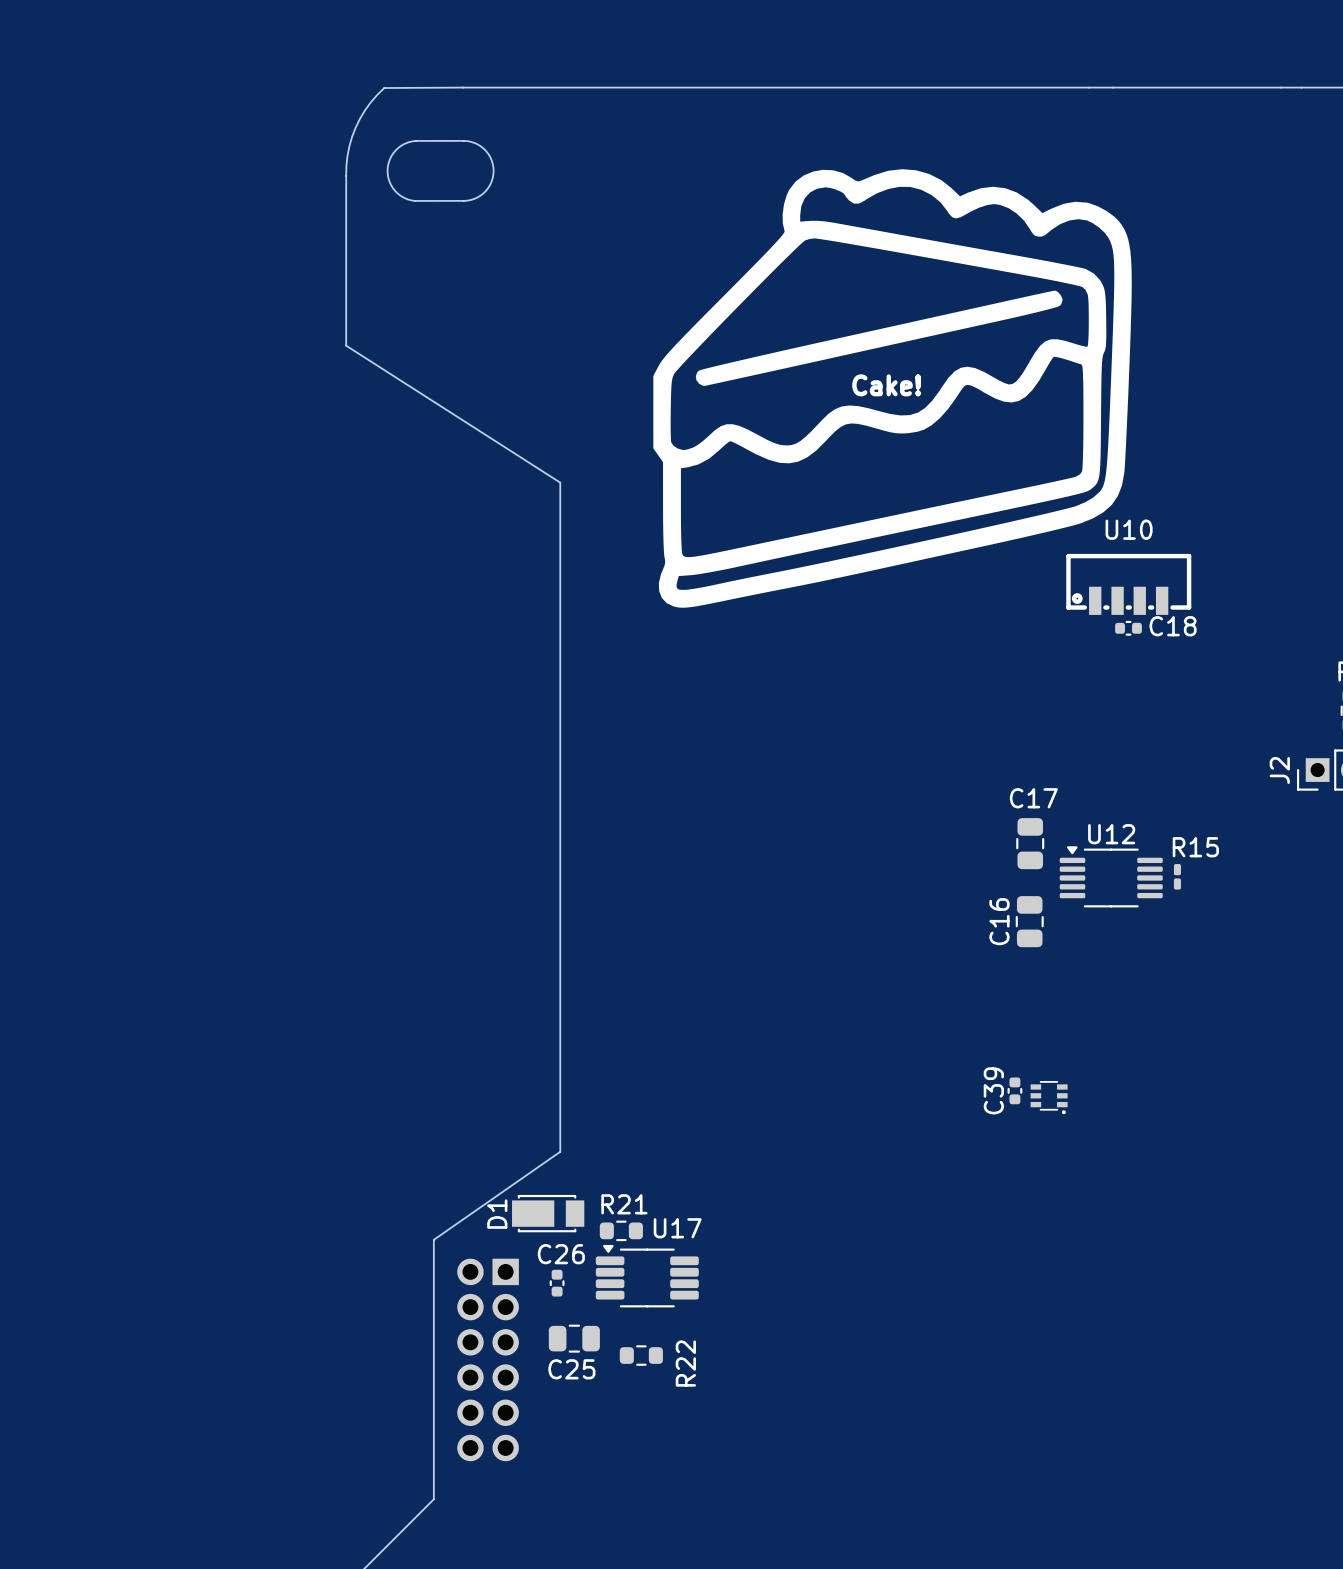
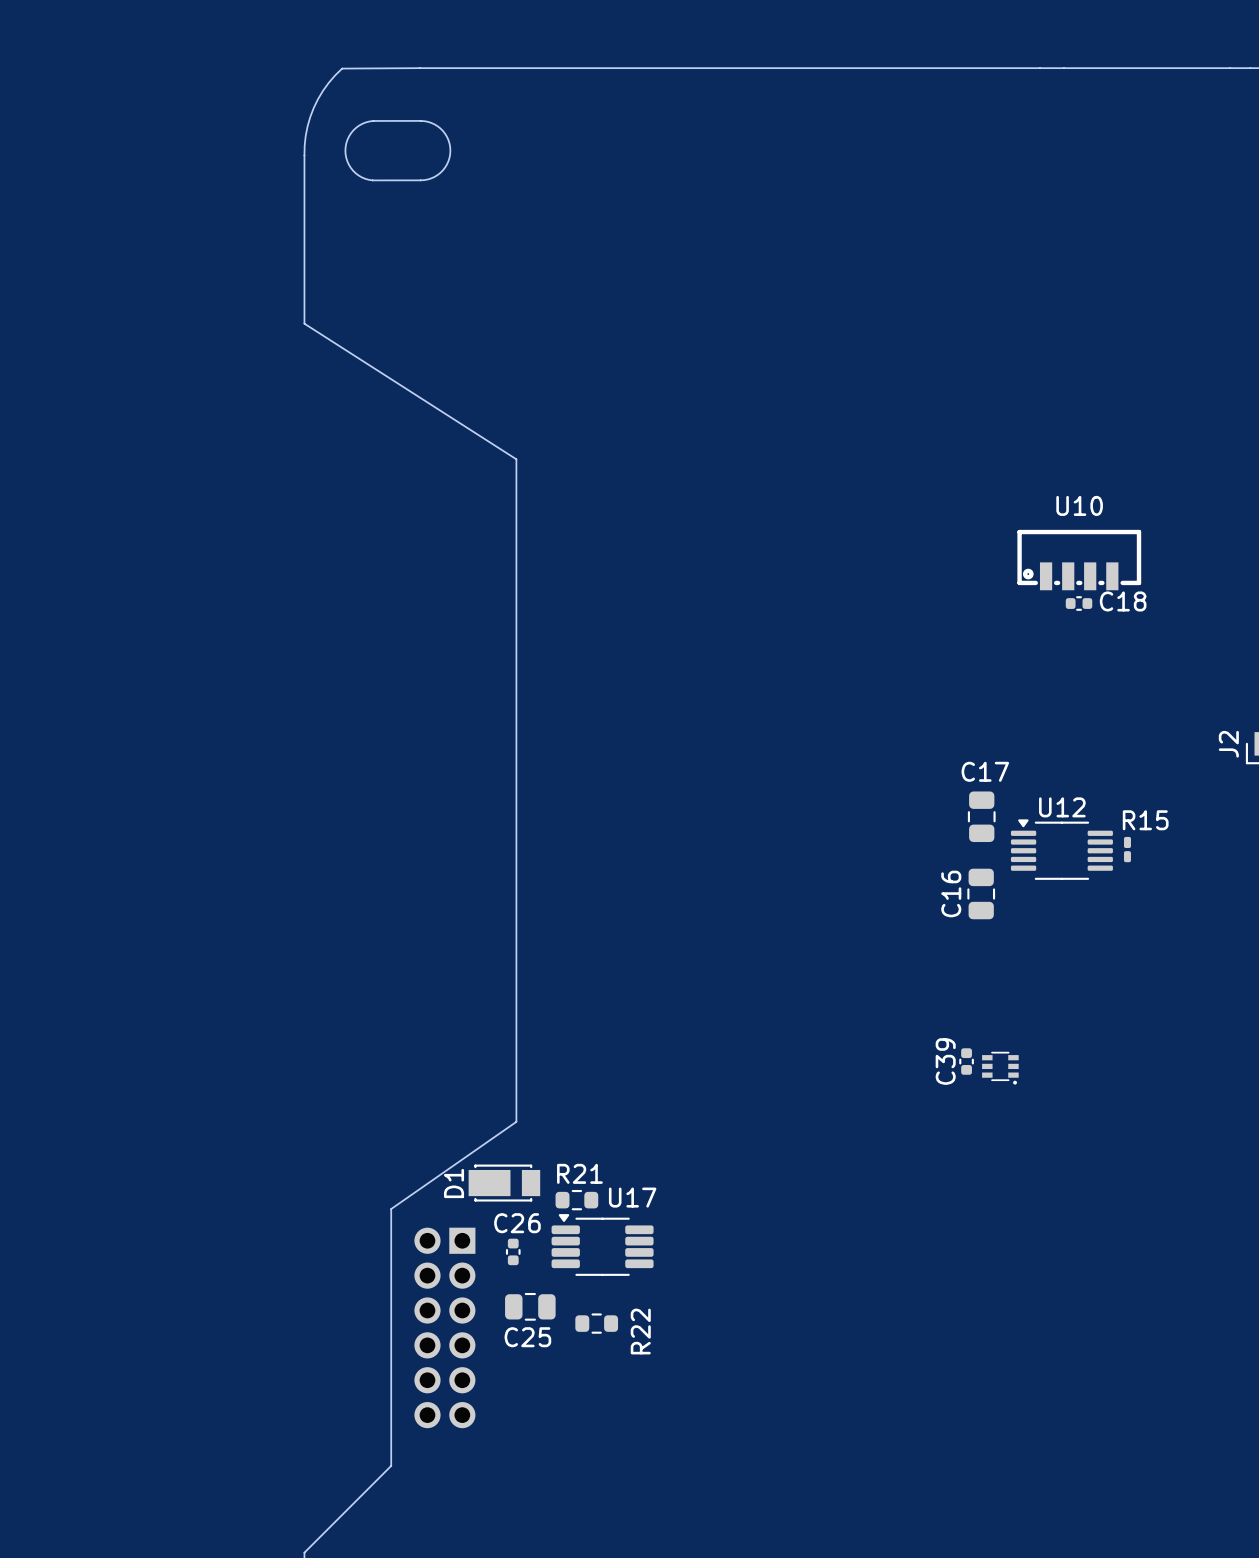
Cake!: (892, 388) -> none

